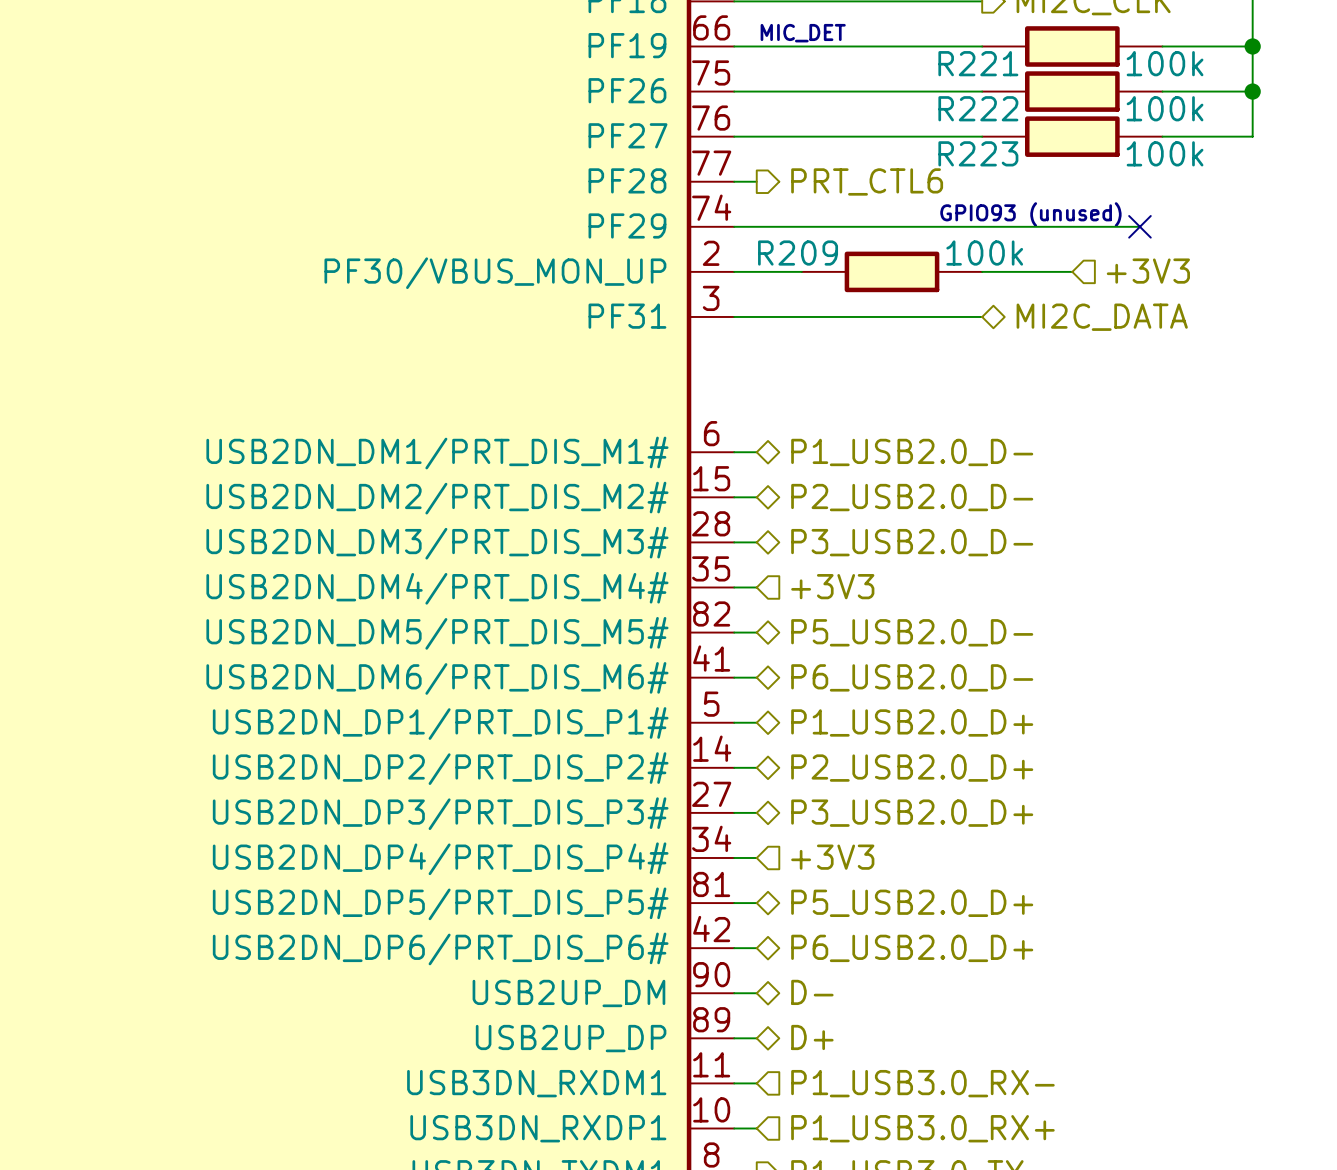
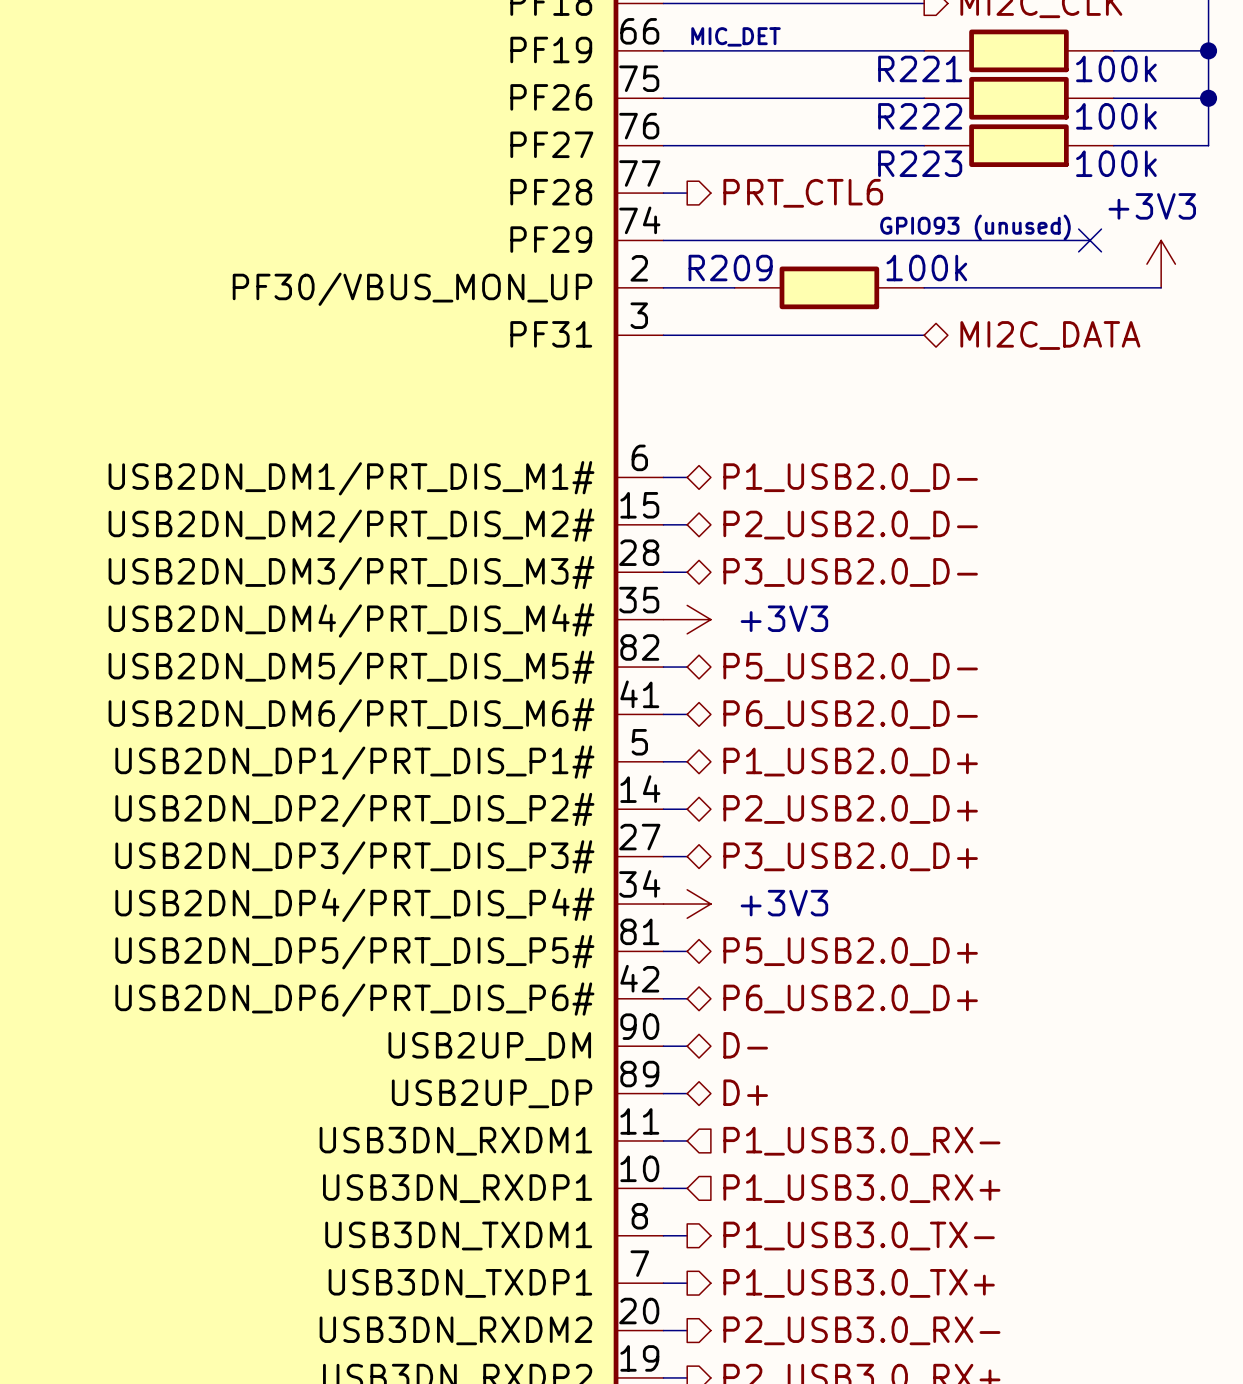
power symbol: none -> +3V3 (1161, 264)
wire: none -> (1018, 287) (1161, 287)
hierarchical label: +3V3 (1148, 271) -> none
hierarchical label: +3V3 (832, 586) -> none
power symbol: none -> +3V3 (687, 619)
power symbol: none -> +3V3 (687, 904)
hierarchical label: +3V3 (832, 857) -> none

